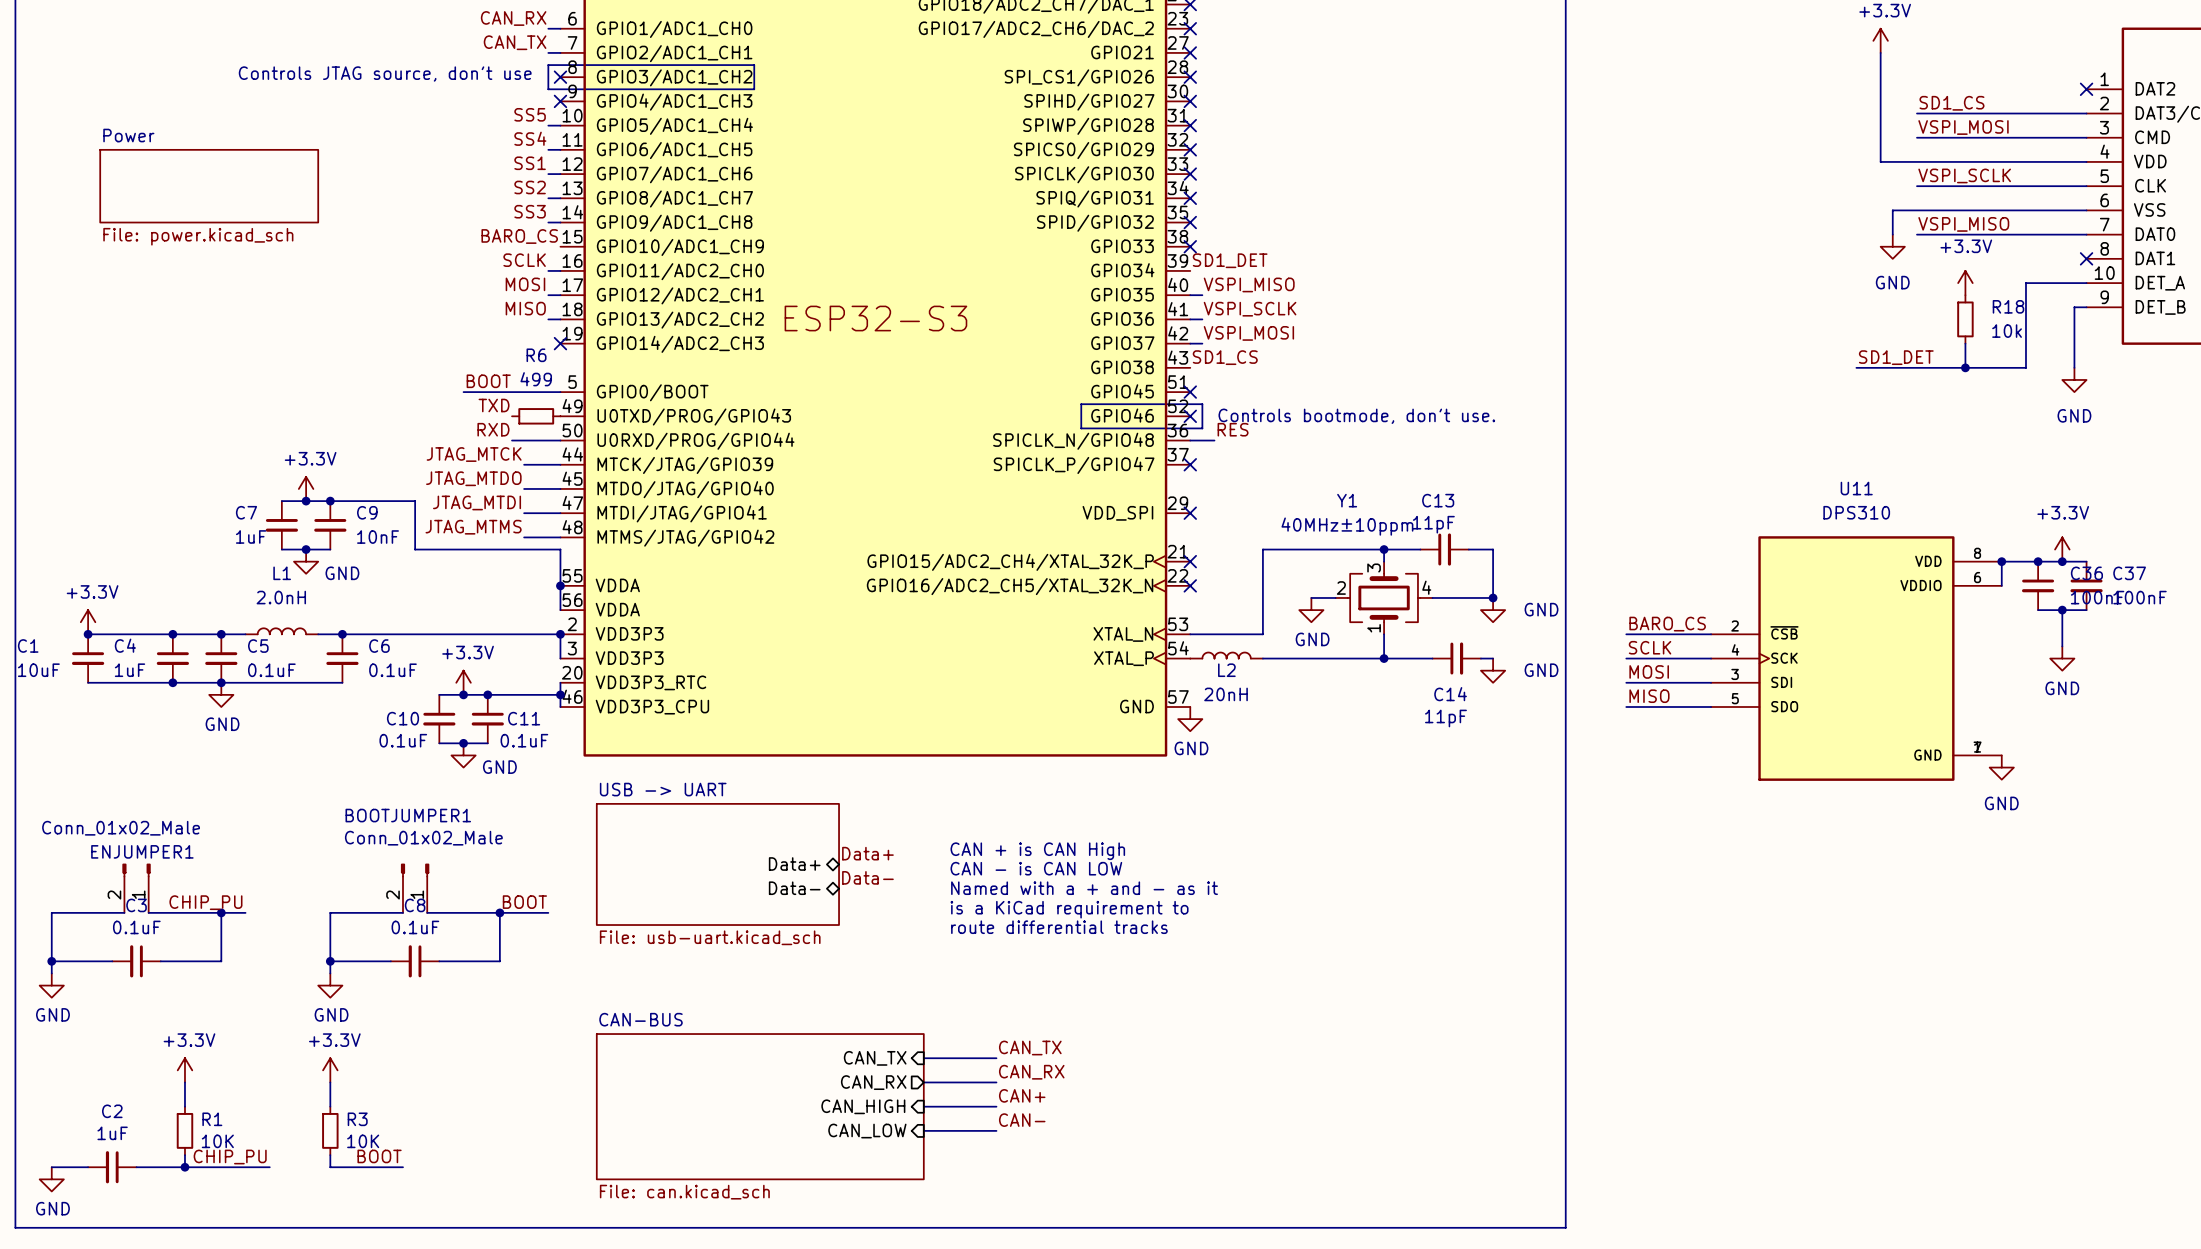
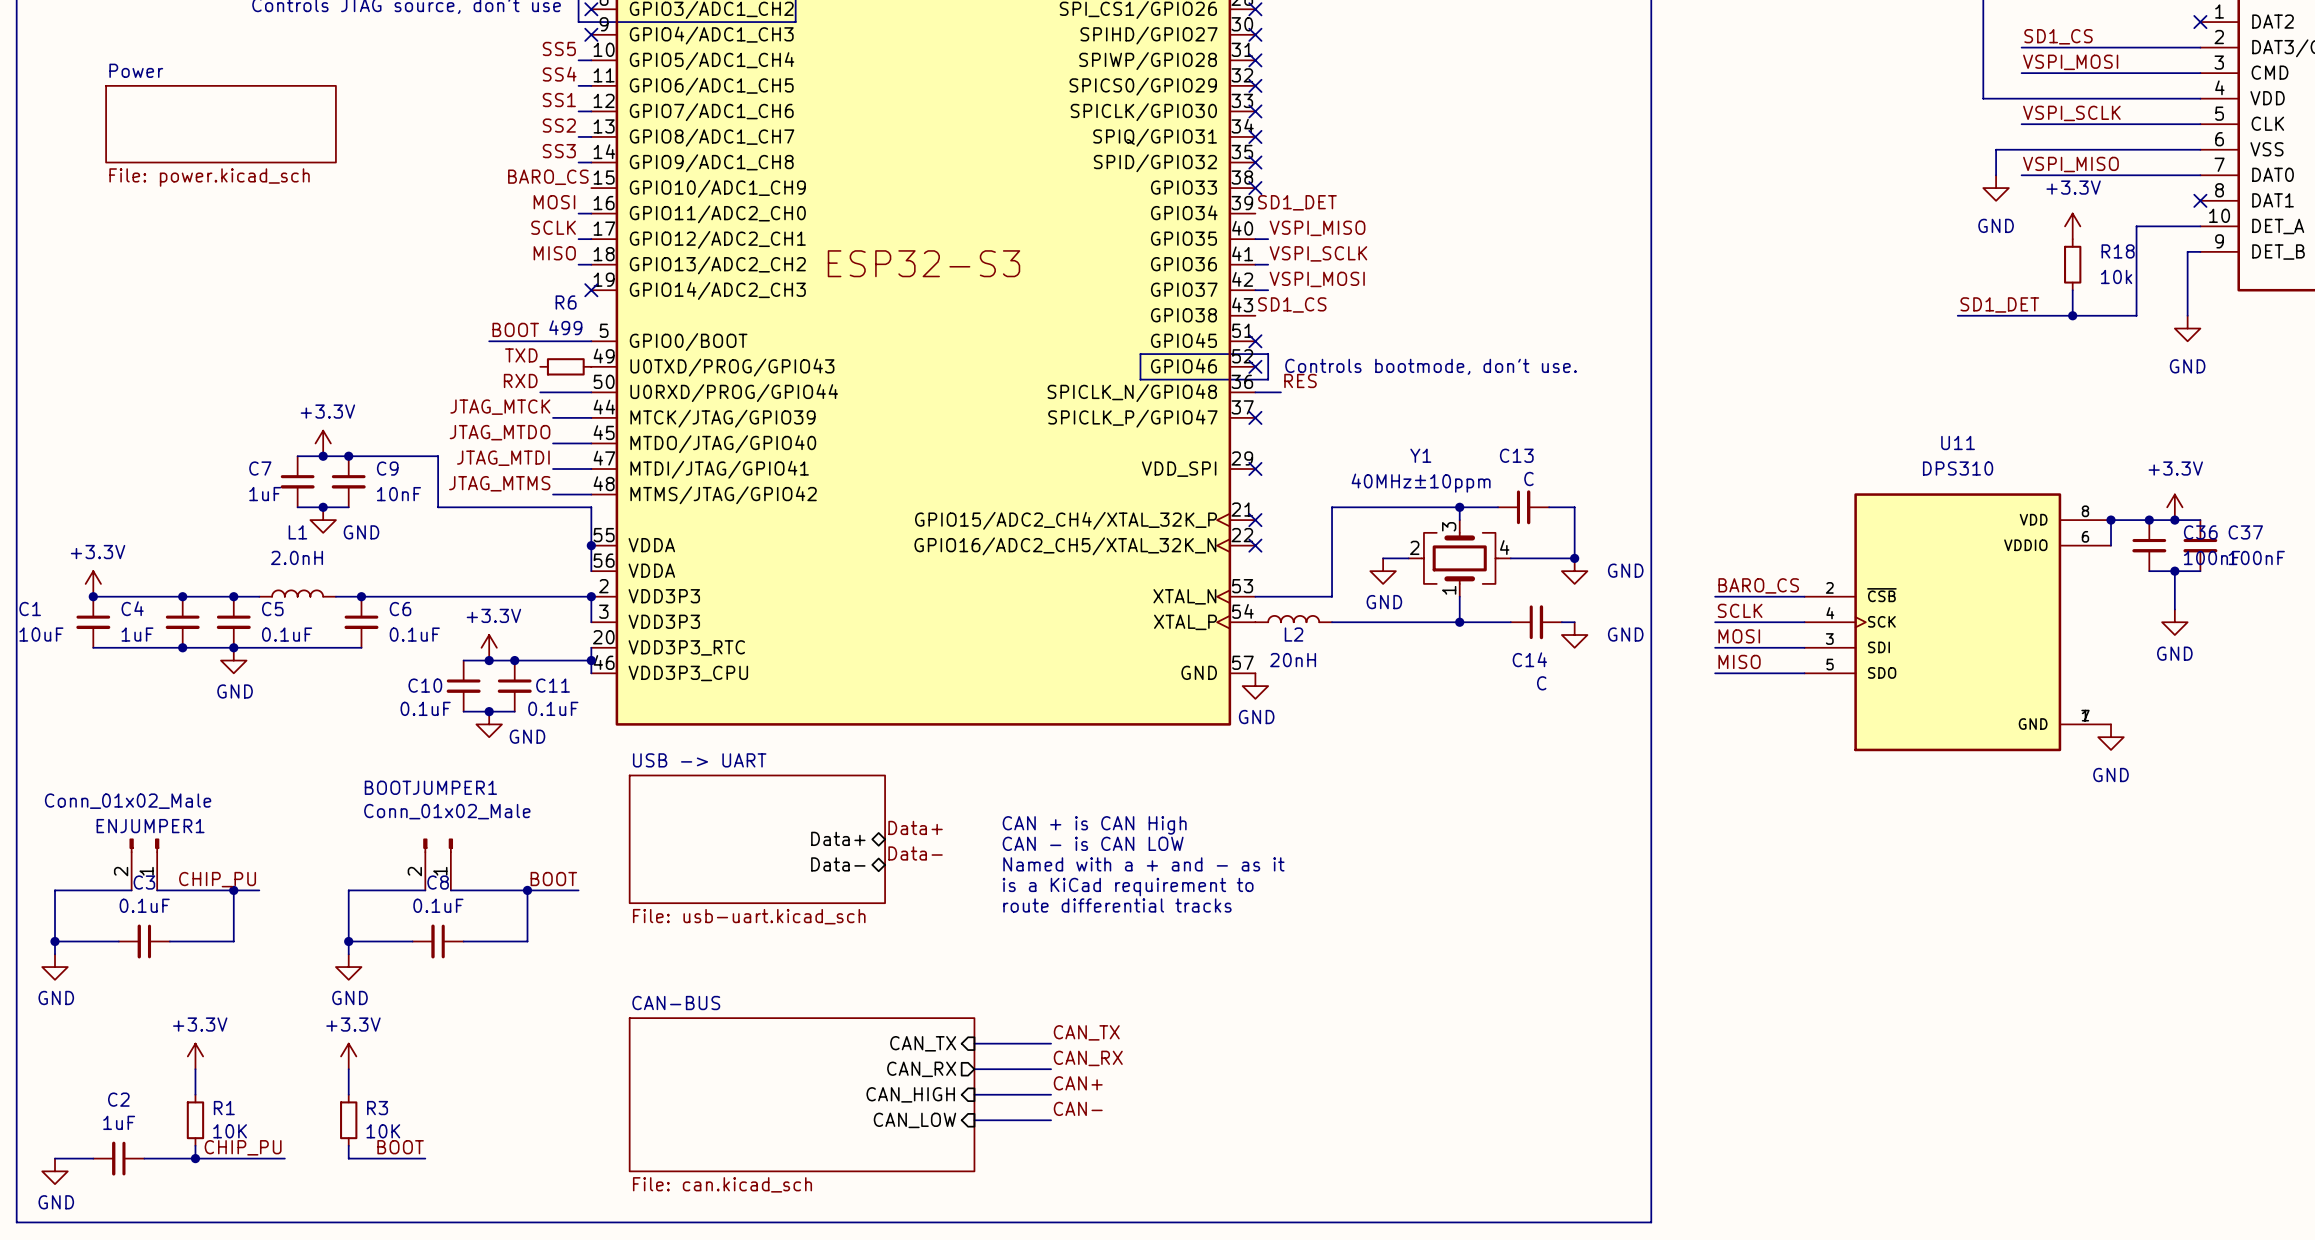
label: SCLK (524, 260) -> MOSI (554, 202)
label: MOSI (525, 284) -> SCLK (553, 227)
C13 value: 11pF (1433, 524) -> C (1528, 478)
C14 value: 11pF (1445, 718) -> C (1541, 683)

